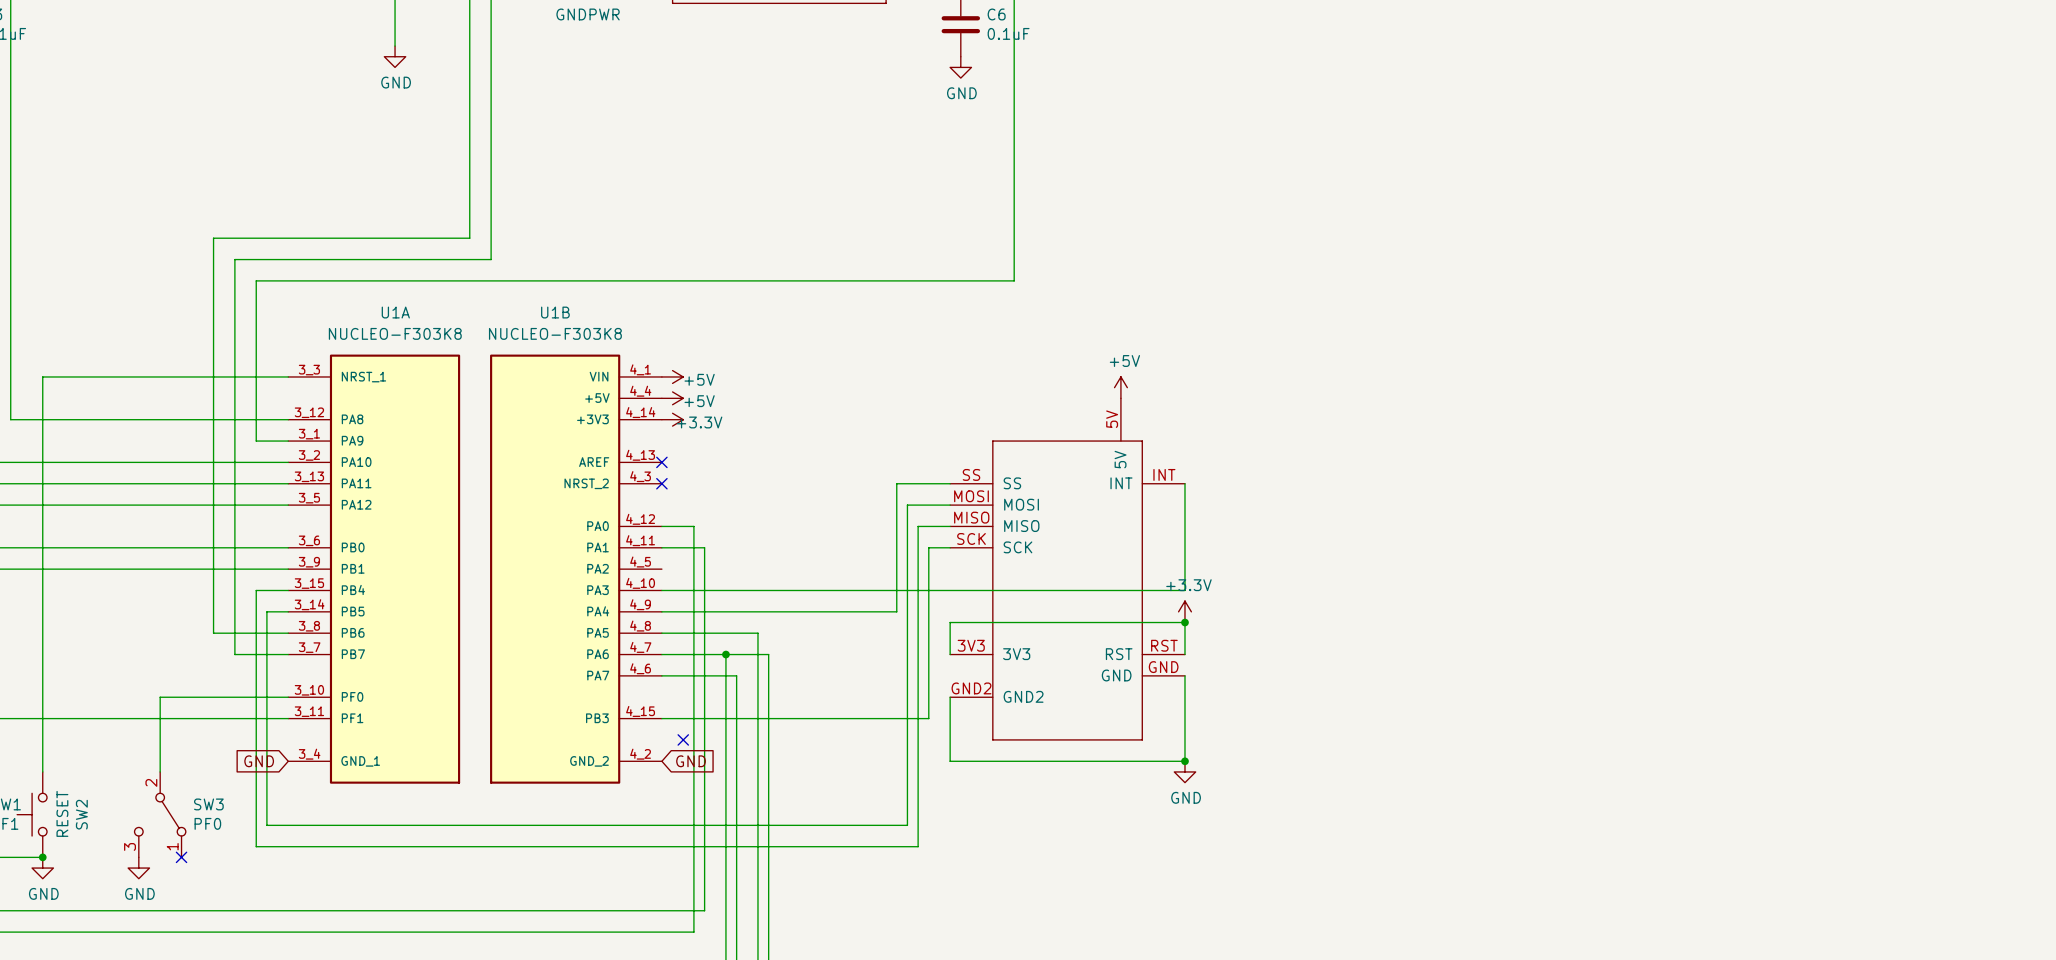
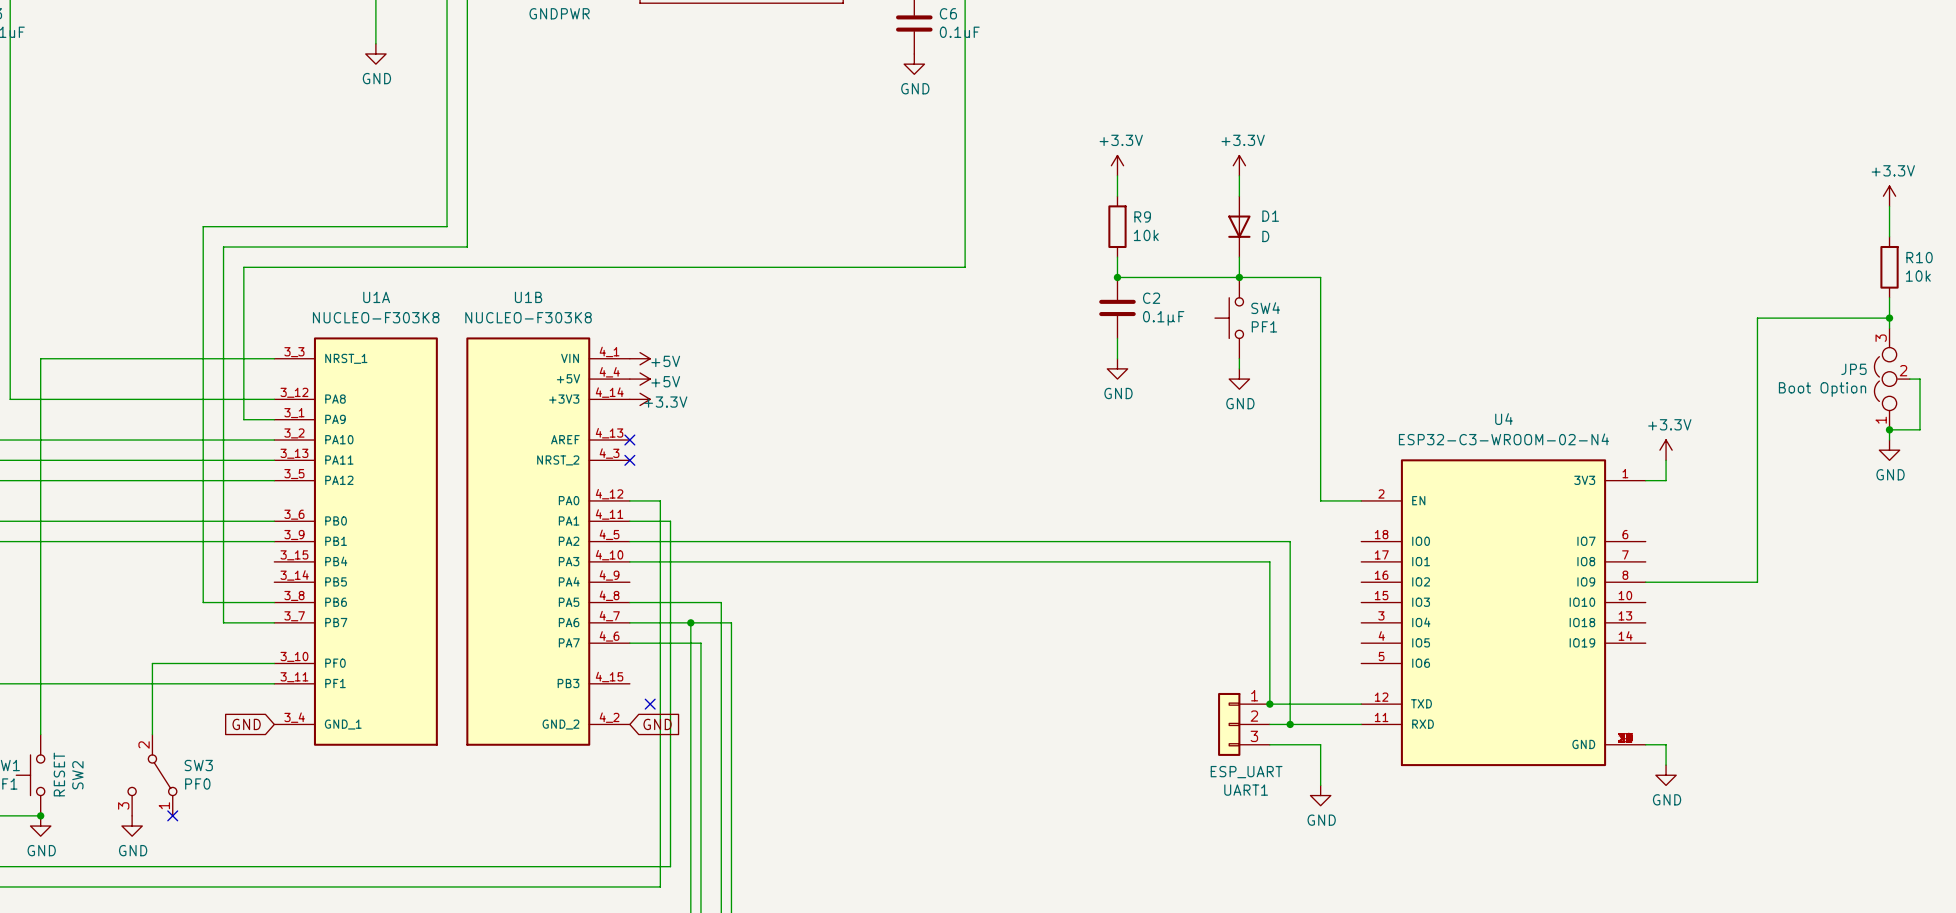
power symbol: none -> +3.3V (1117, 165)
power symbol: none -> +3.3V (1239, 165)
wire: none -> (1117, 175) (1117, 196)
wire: none -> (1239, 175) (1239, 196)
power symbol: none -> +3.3V (1889, 196)
wire: none -> (1889, 206) (1889, 236)
R9: none -> 10k (1117, 226)
D1: none -> D (1239, 226)
wire: none -> (1117, 257) (1117, 277) (1320, 277) (1320, 500) (1361, 500)
wire: none -> (1239, 257) (1239, 277)
R10: none -> 10k (1889, 267)
junction: none -> (1117, 277)
junction: none -> (1239, 277)
wire: none -> (1889, 297) (1889, 328)
C2: none -> 0.1μF (1117, 307)
SW4: none -> PF1 (1229, 318)
wire: none -> (1889, 318) (1757, 318) (1757, 582) (1645, 582)
junction: none -> (1889, 318)
wire: none -> (1117, 338) (1117, 358)
wire: none -> (1239, 358) (1239, 368)
power symbol: +5V (1120, 387) -> none
power symbol: none -> GND (1117, 368)
power symbol: none -> GND (1239, 379)
JP5: none -> Boot Option (1892, 379)
wire: none -> (1909, 379) (1920, 379) (1920, 429) (1889, 429) (1889, 440)
junction: none -> (1889, 429)
power symbol: none -> +3.3V (1666, 450)
power symbol: none -> GND (1889, 450)
wire: (950, 483) (896, 483) (896, 611) (661, 611) -> none
wire: (1184, 483) (1184, 590) -> (1361, 704) (1269, 704) (1269, 561) (1127, 561)
wire: none -> (1666, 460) (1666, 480) (1645, 480)
wire: (950, 505) (907, 505) (907, 825) (266, 825) (266, 611) (288, 611) -> none
wire: (950, 526) (918, 526) (918, 846) (256, 846) (256, 590) (288, 590) -> none
wire: (950, 547) (928, 547) (928, 718) (661, 718) -> none
wire: none -> (629, 541) (1290, 541) (1290, 724)
part: (1067, 569) -> none
power symbol: +3.3V (1184, 611) -> none
junction: (1184, 622) -> none
U4: none -> ESP32-C3-WROOM-02-N4 (1503, 612)
wire: (950, 654) (950, 622) (1184, 622) (1184, 654) -> none
wire: (1184, 675) (1184, 761) (950, 761) (950, 697) -> none
junction: none -> (1269, 704)
junction: (1184, 761) -> none
UART1: none -> ESP_UART (1243, 724)
wire: none -> (1269, 724) (1361, 724)
junction: none -> (1290, 724)
power symbol: GND (1184, 771) -> none
wire: none -> (1269, 744) (1320, 744) (1320, 785)
wire: none -> (1645, 744) (1666, 744) (1666, 765)
power symbol: none -> GND (1666, 775)
power symbol: none -> GND (1320, 795)

